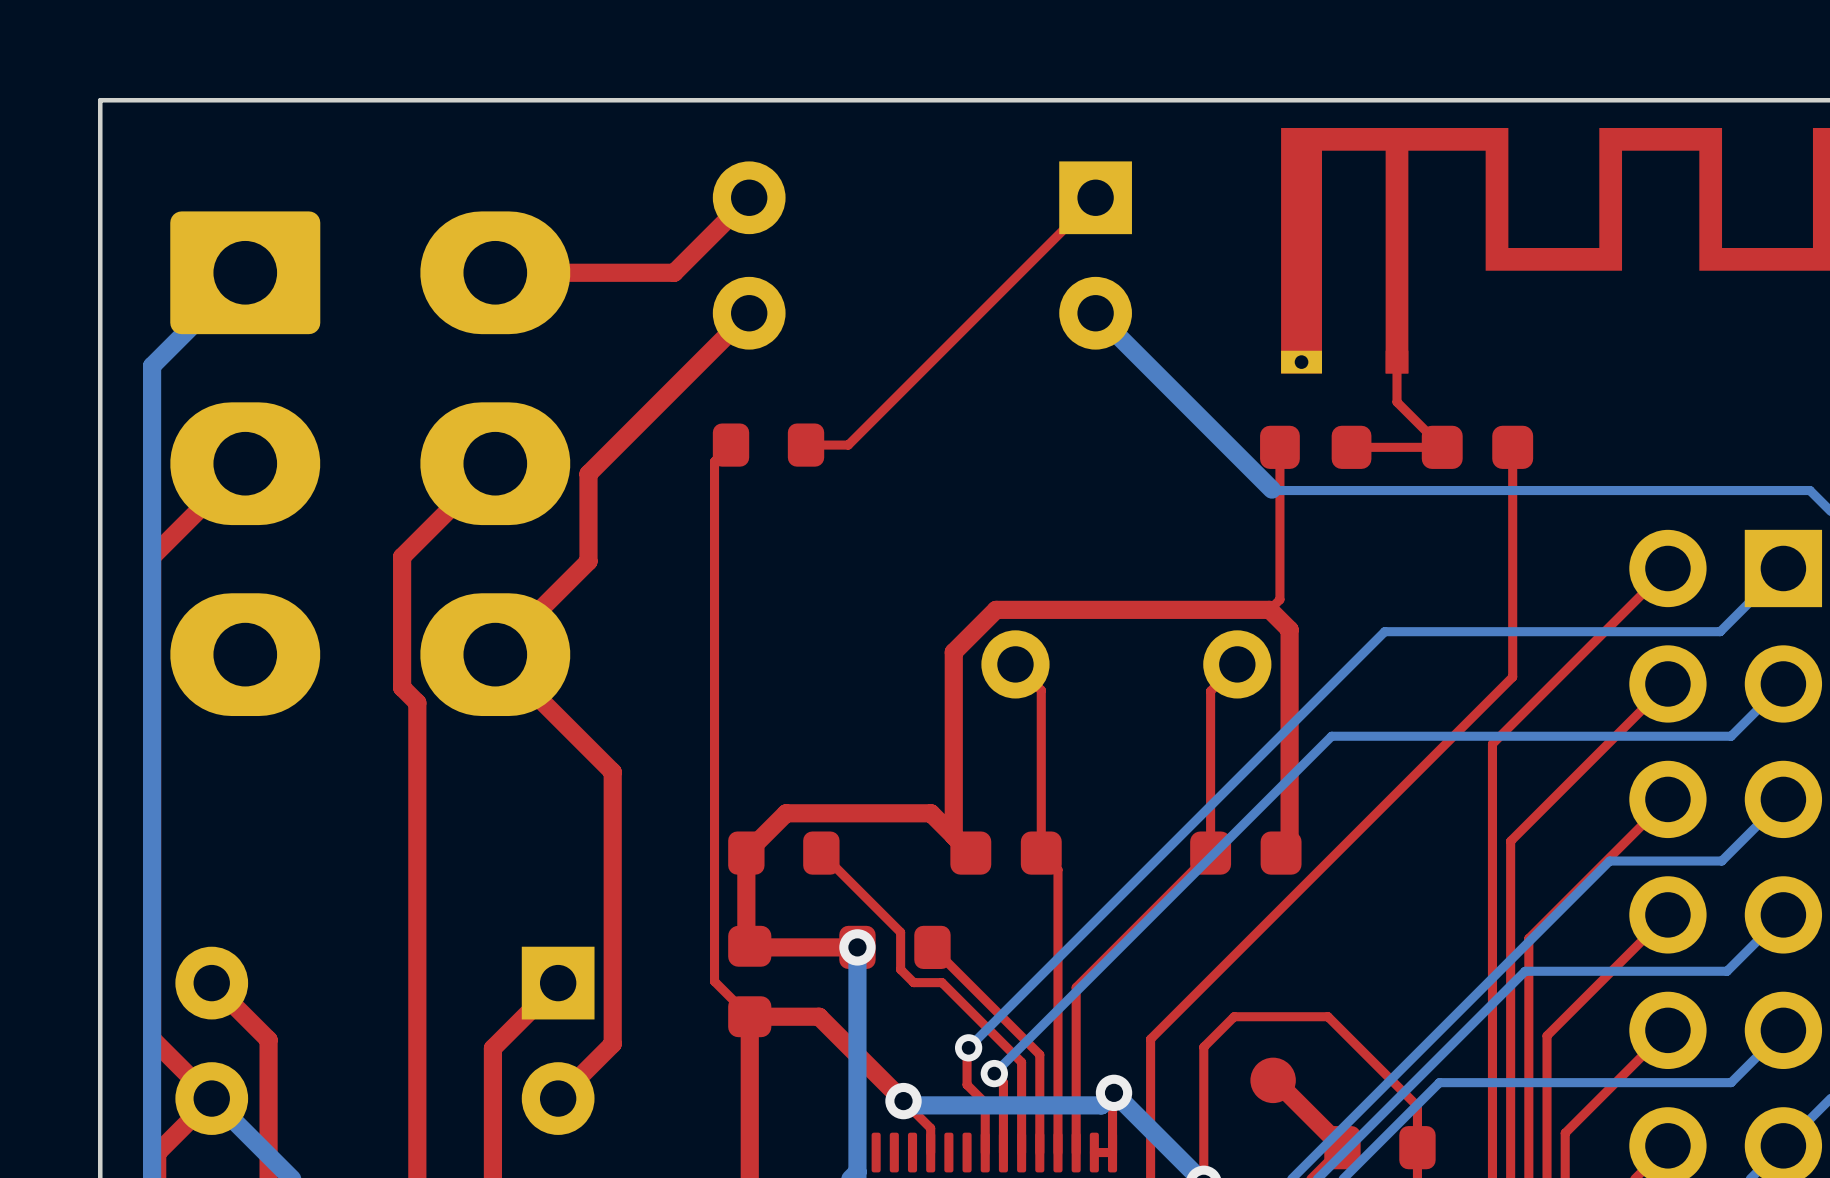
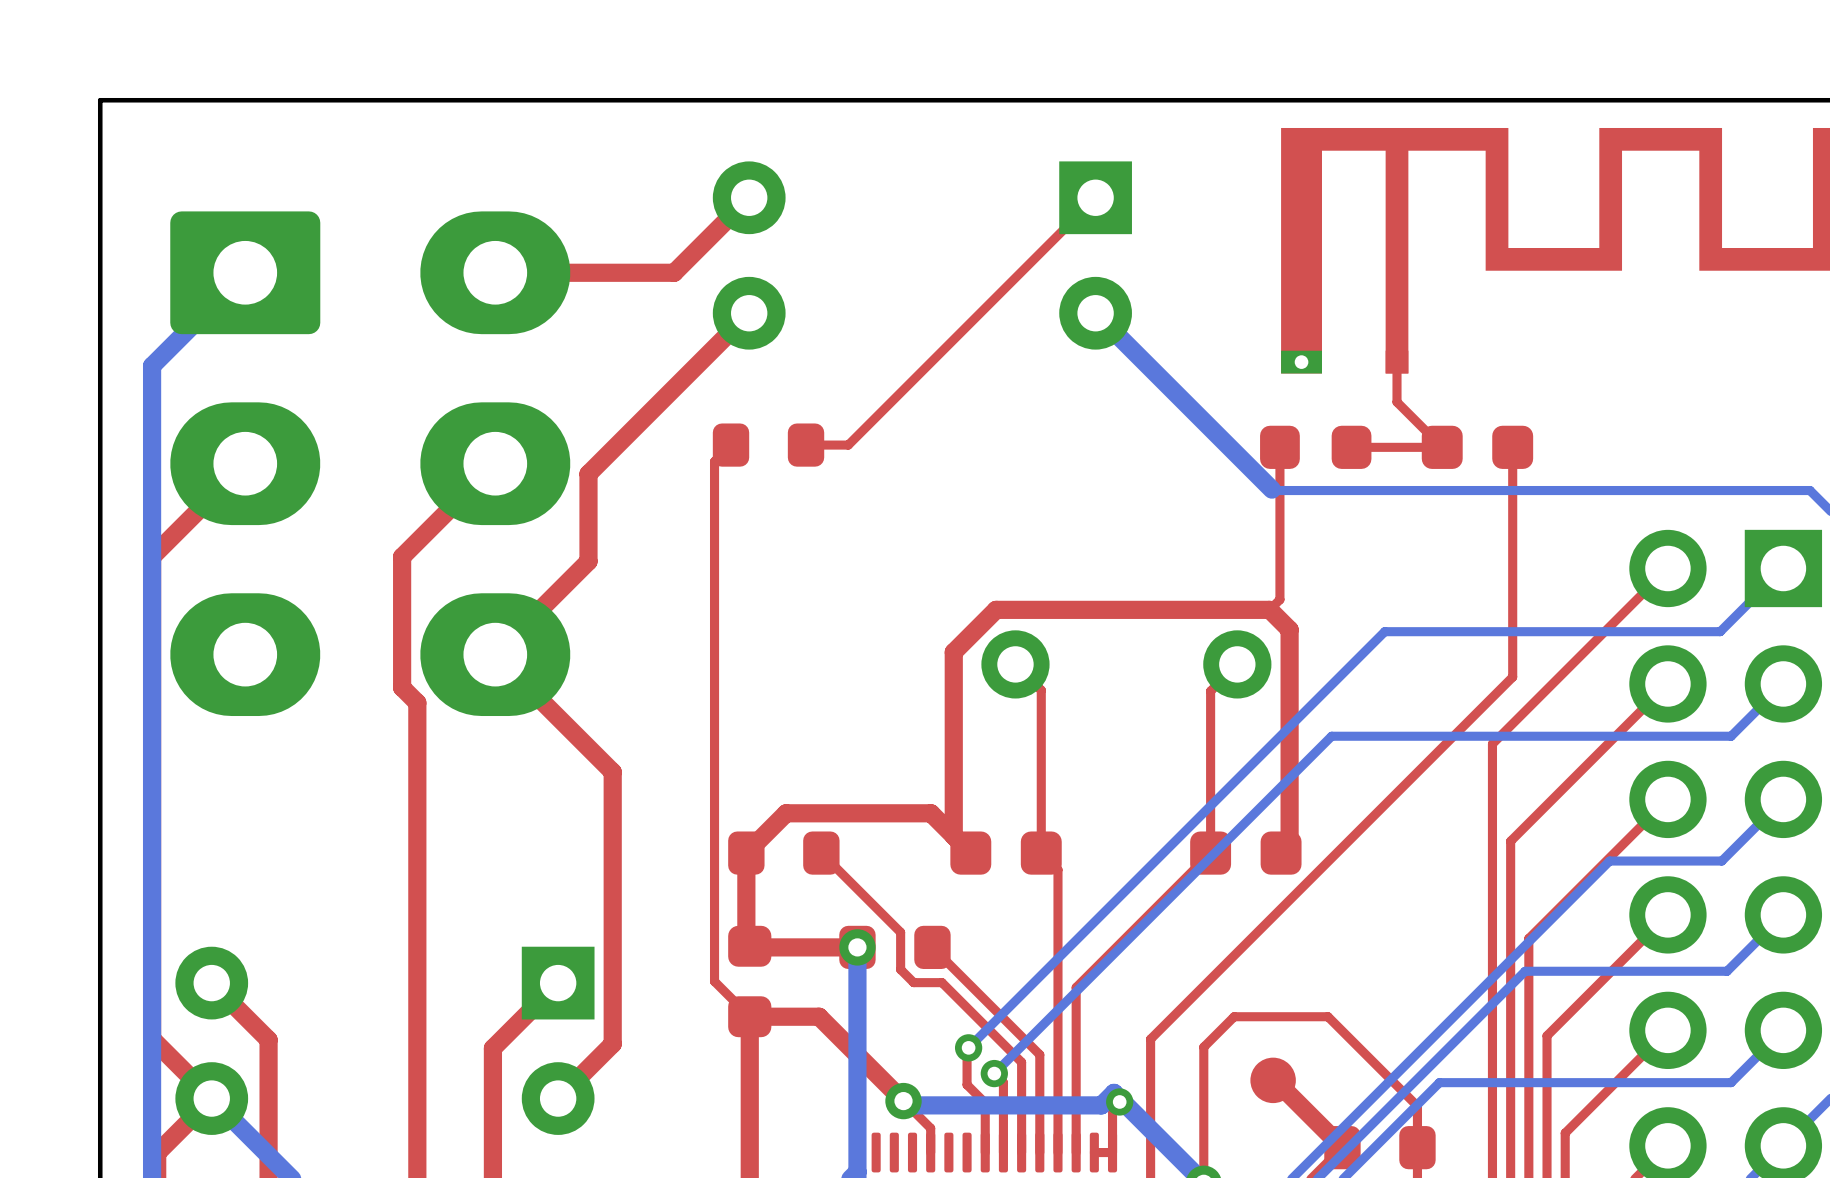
via size: [1095, 1074, 1133, 1112] -> [1106, 1088, 1134, 1116]

